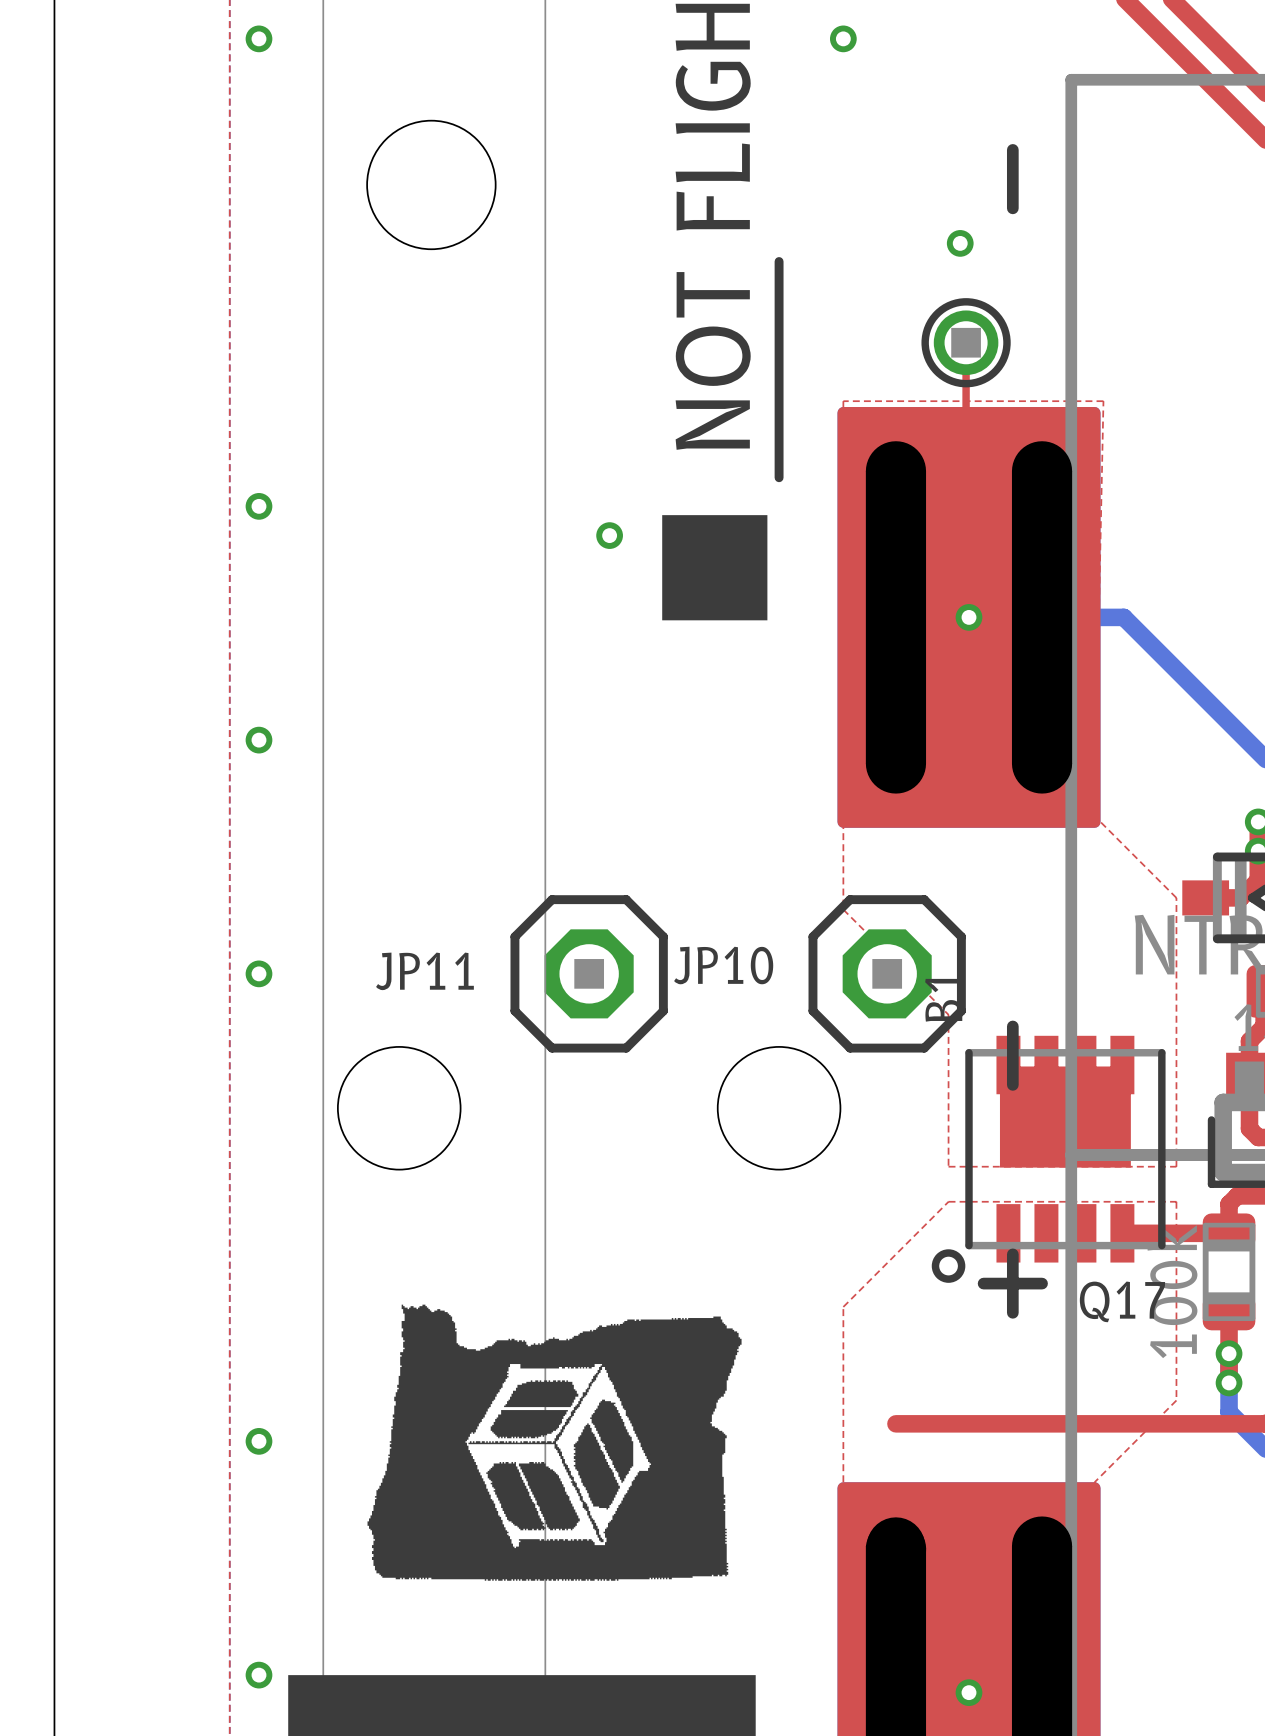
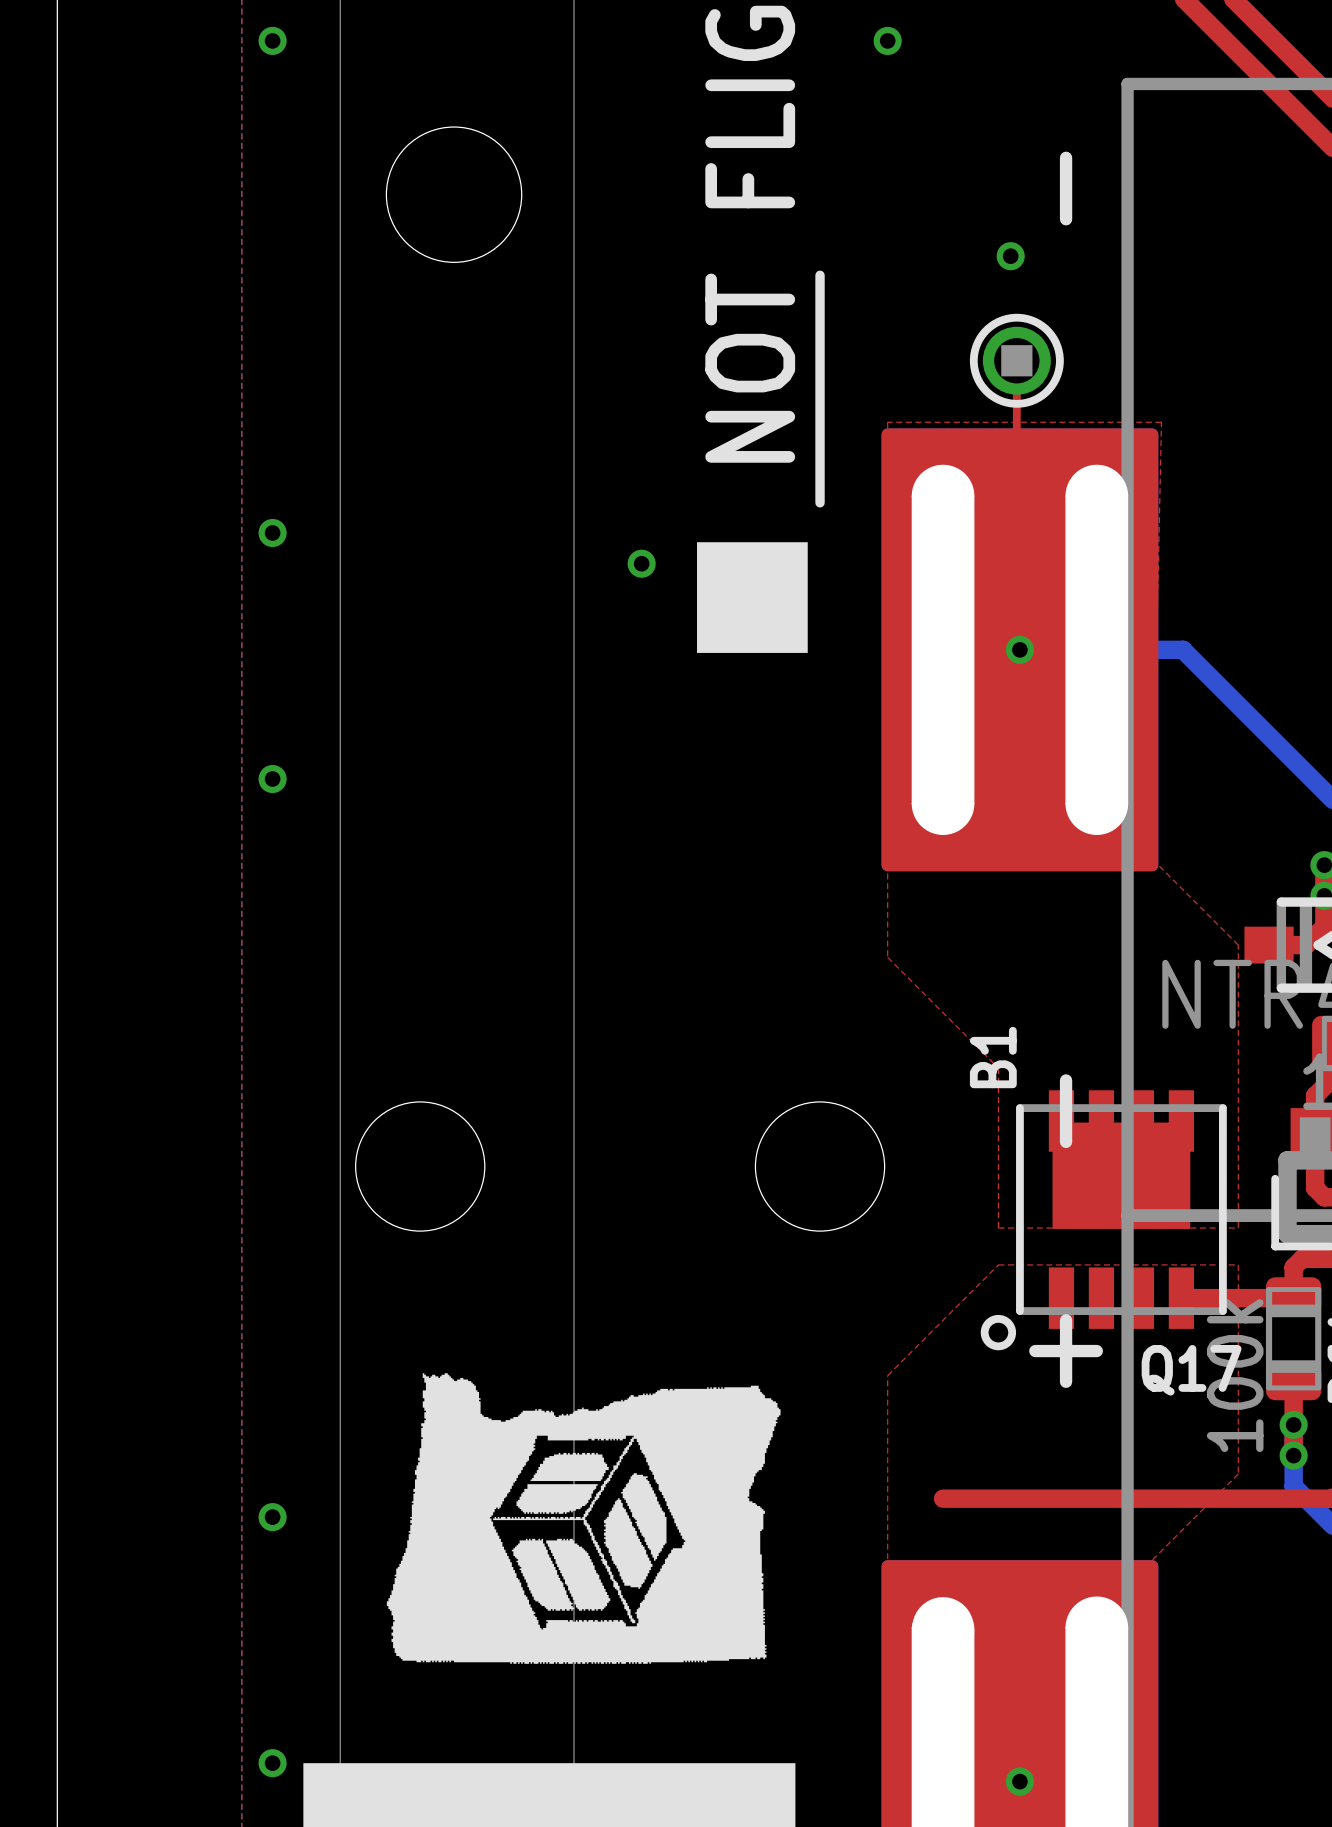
via: (258, 973) -> none
JP11: (589, 973) -> none
JP10: (887, 973) -> none

